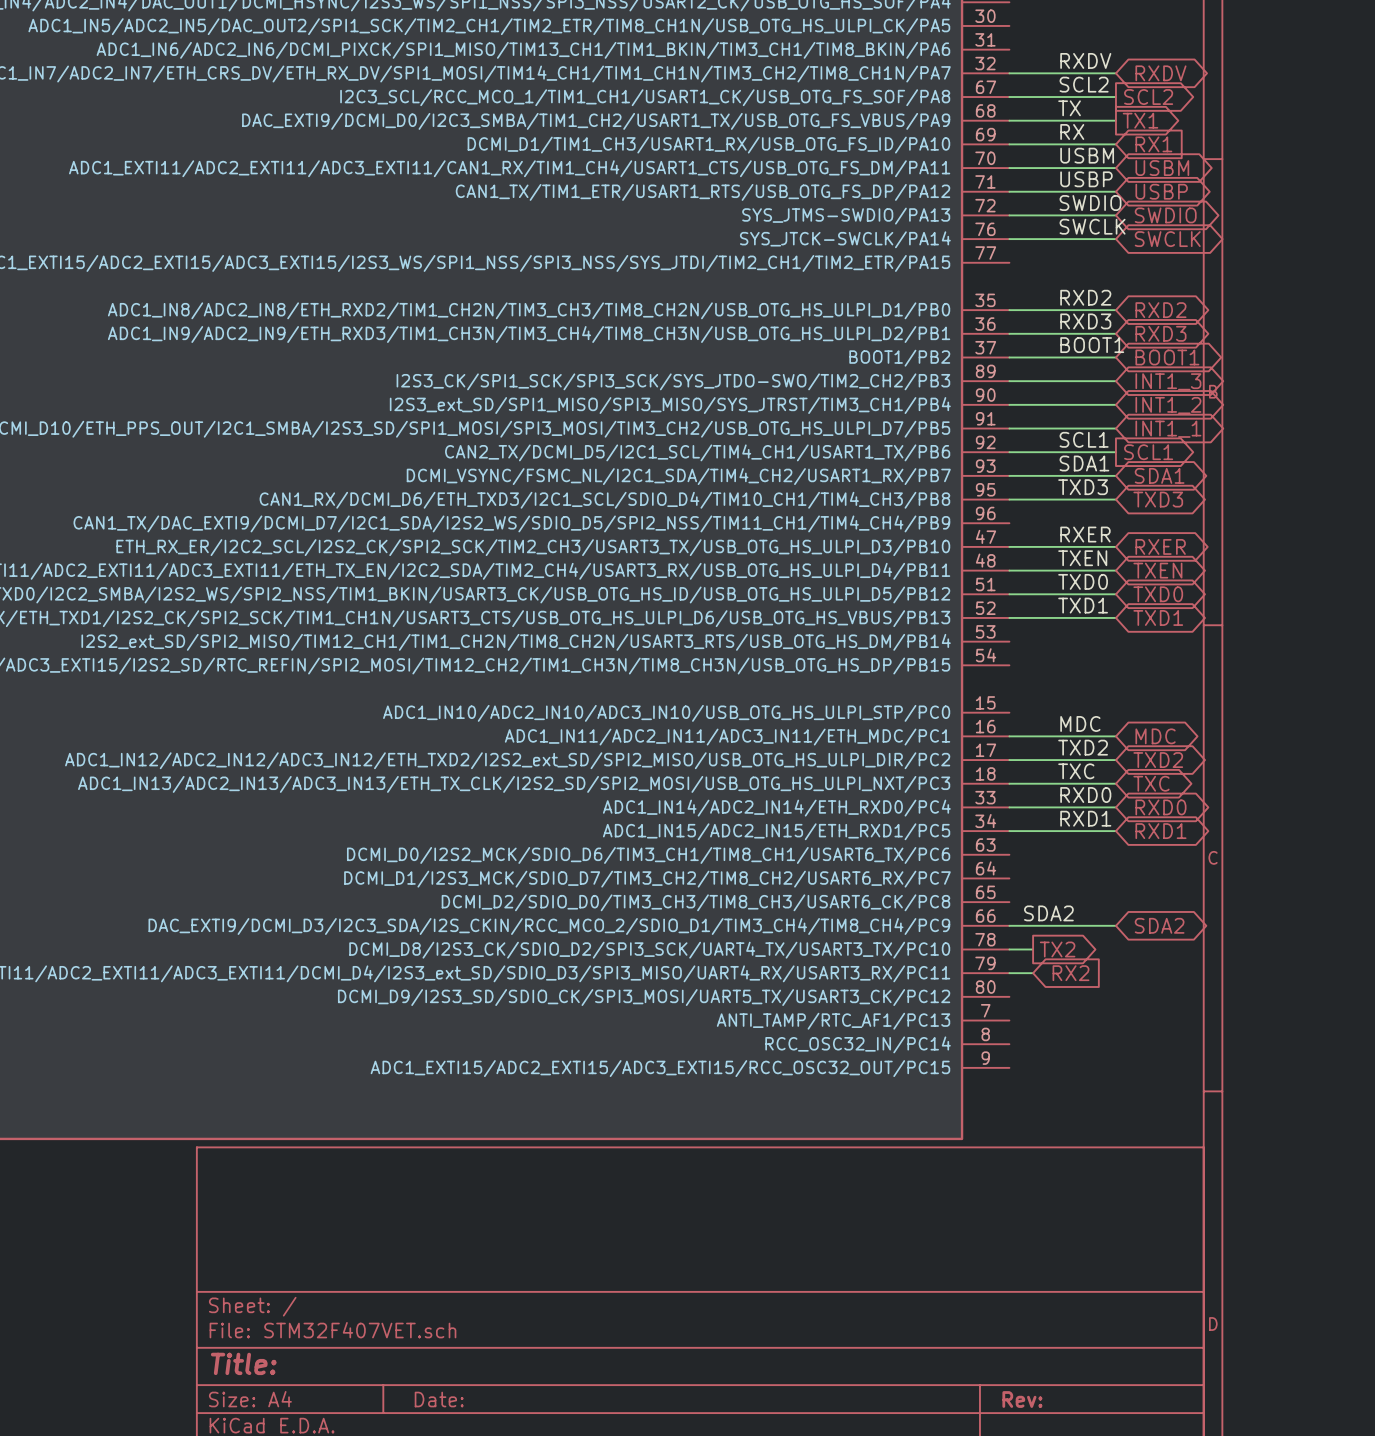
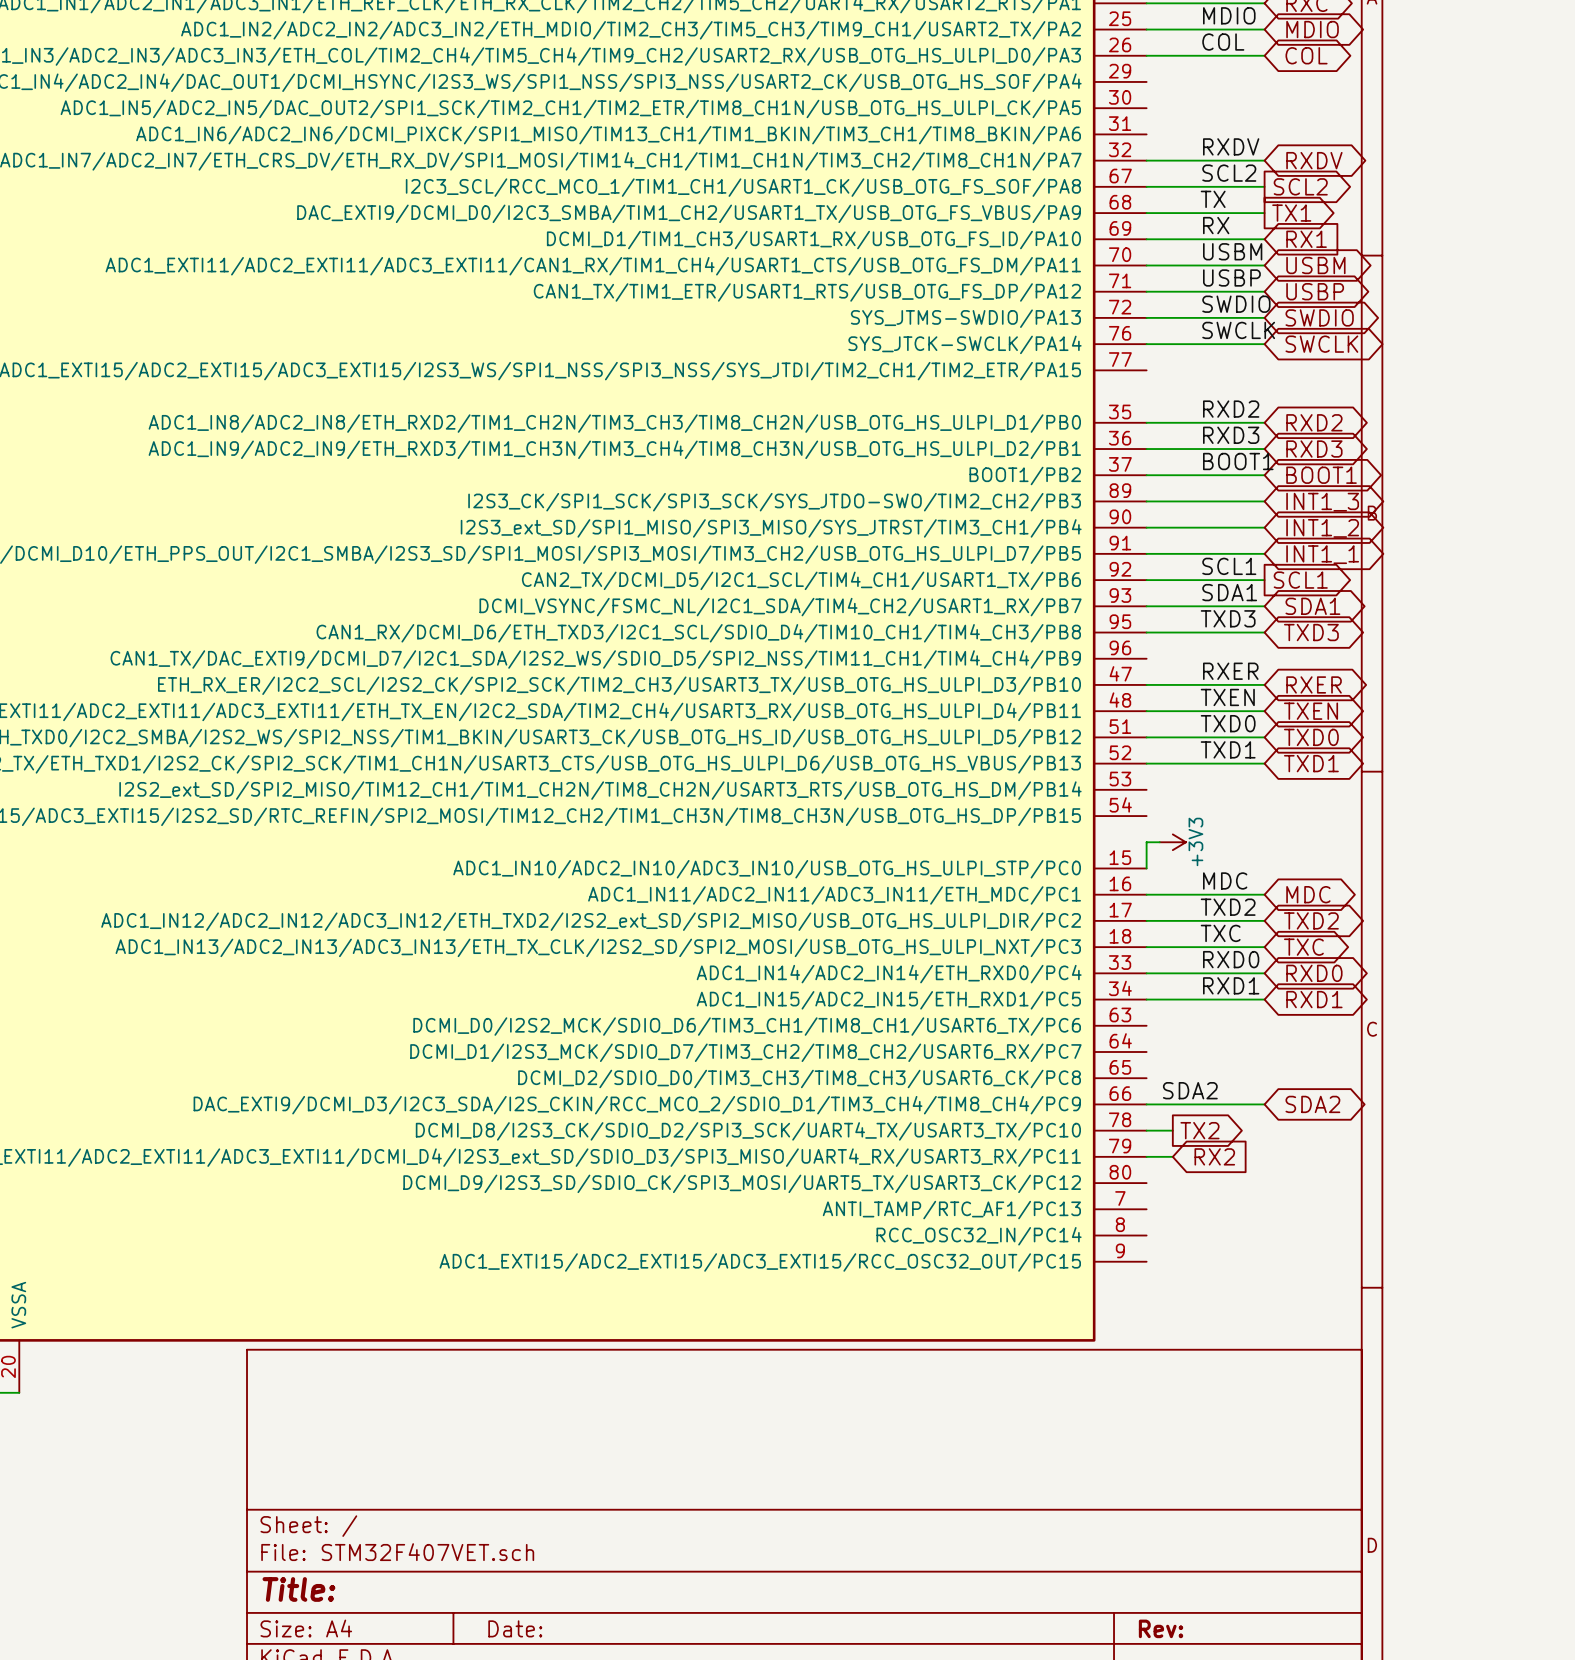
wire: none -> (1159, 842) (1146, 842) (1146, 868)
power symbol: none -> +3V3 (1172, 842)

